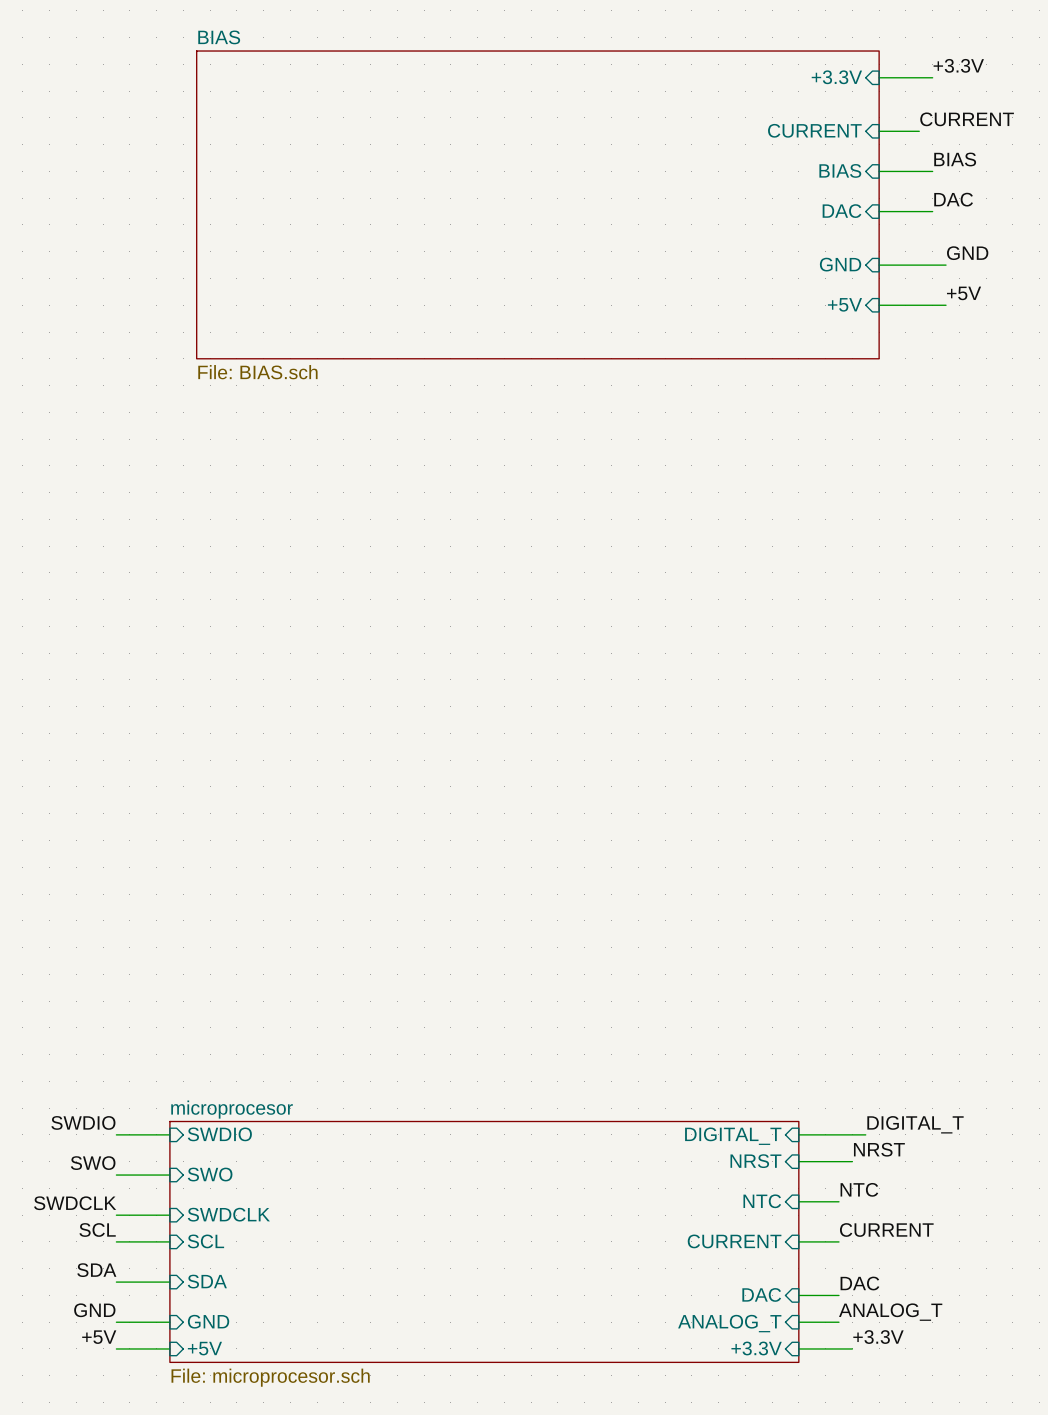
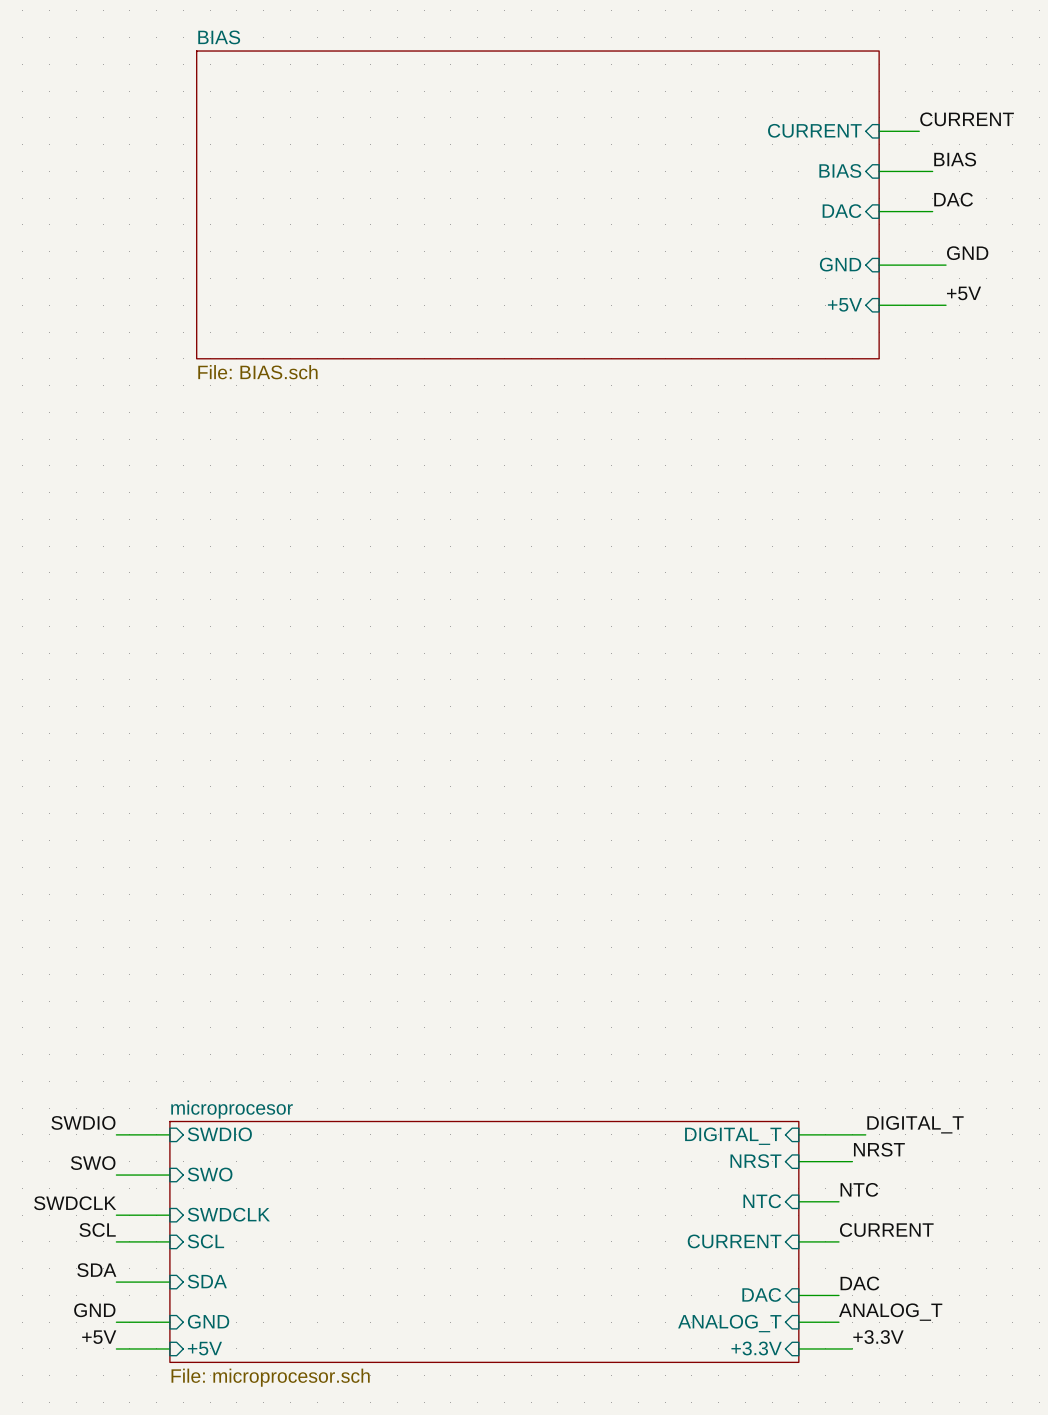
label: +3.3V (958, 65) -> none
sheet pin: +3.3V (836, 77) -> none
wire: (879, 77) (932, 77) -> none

